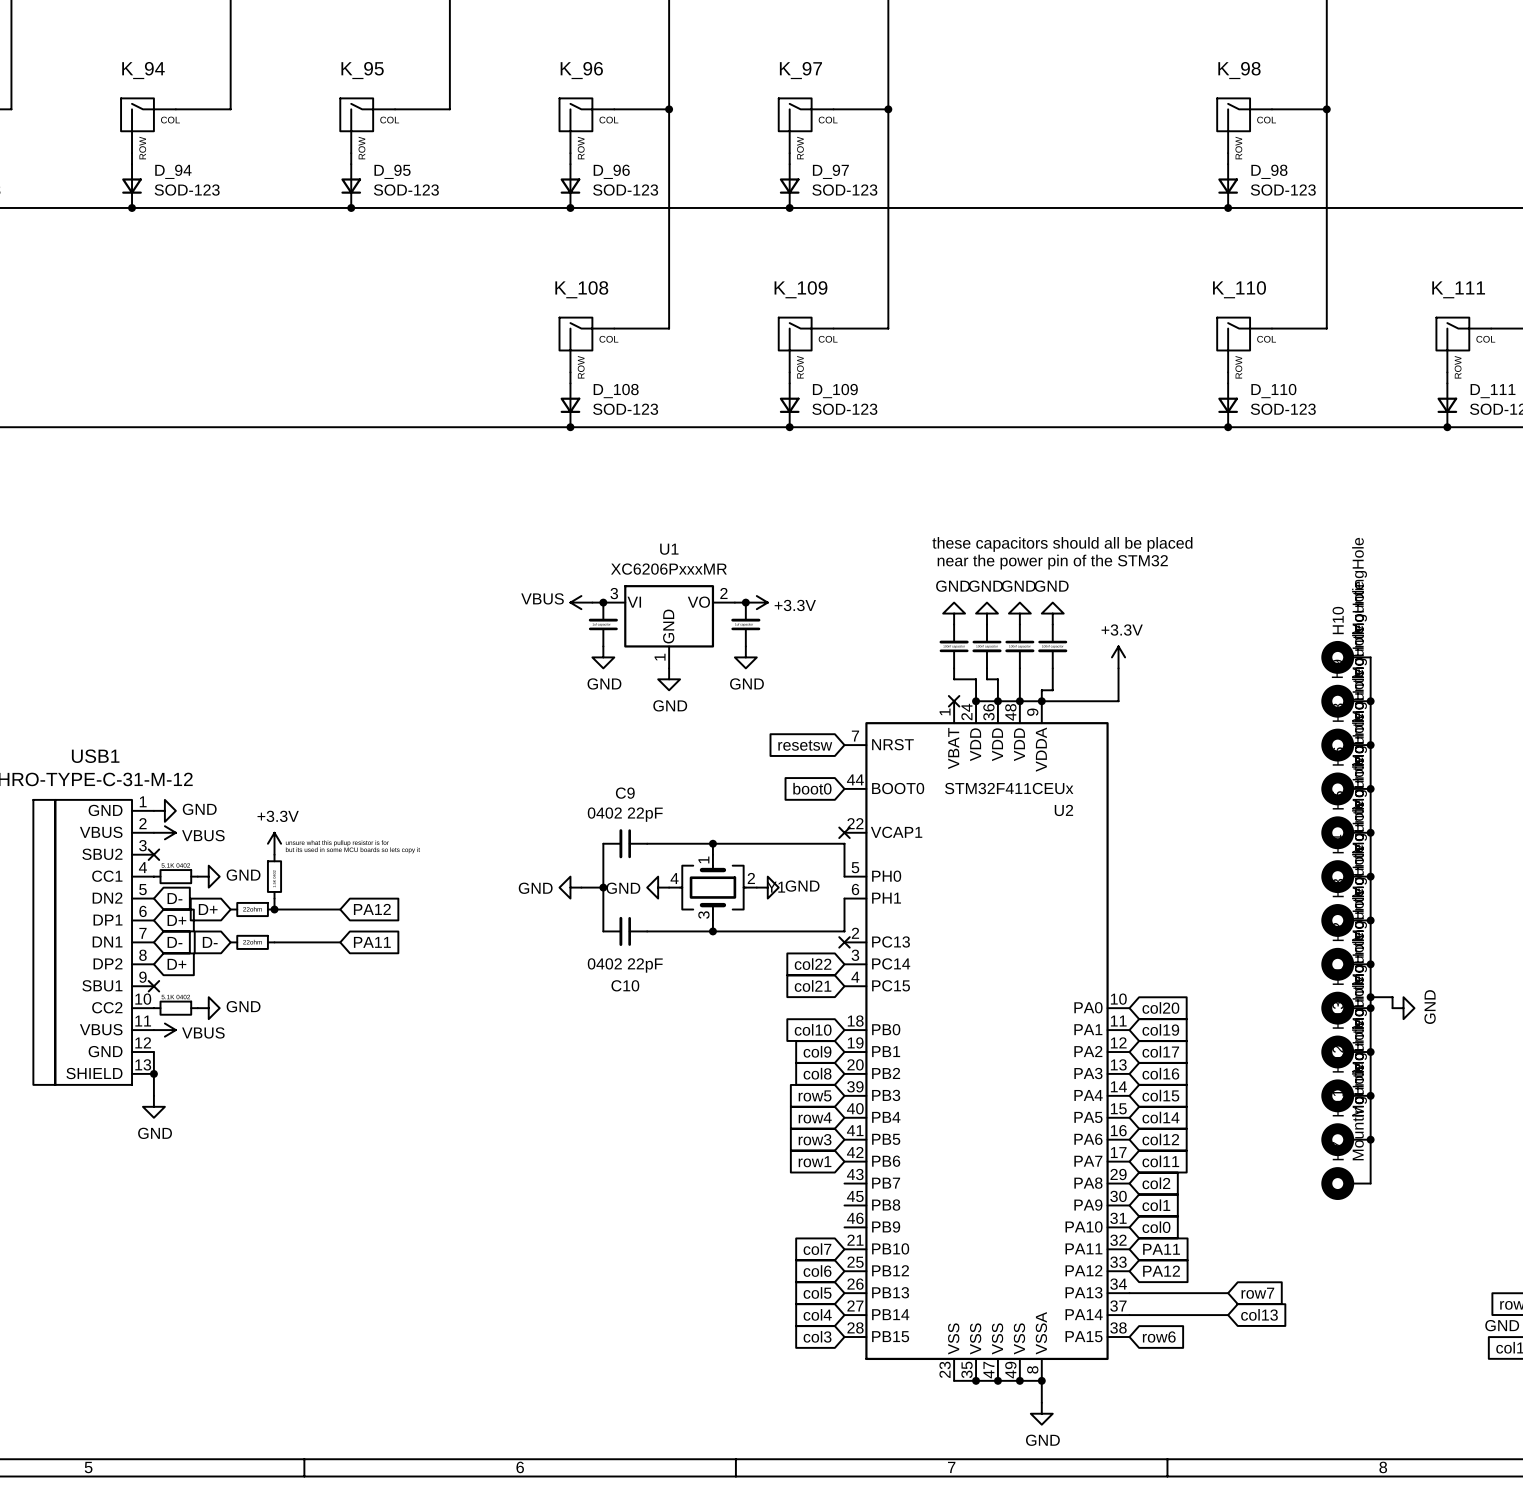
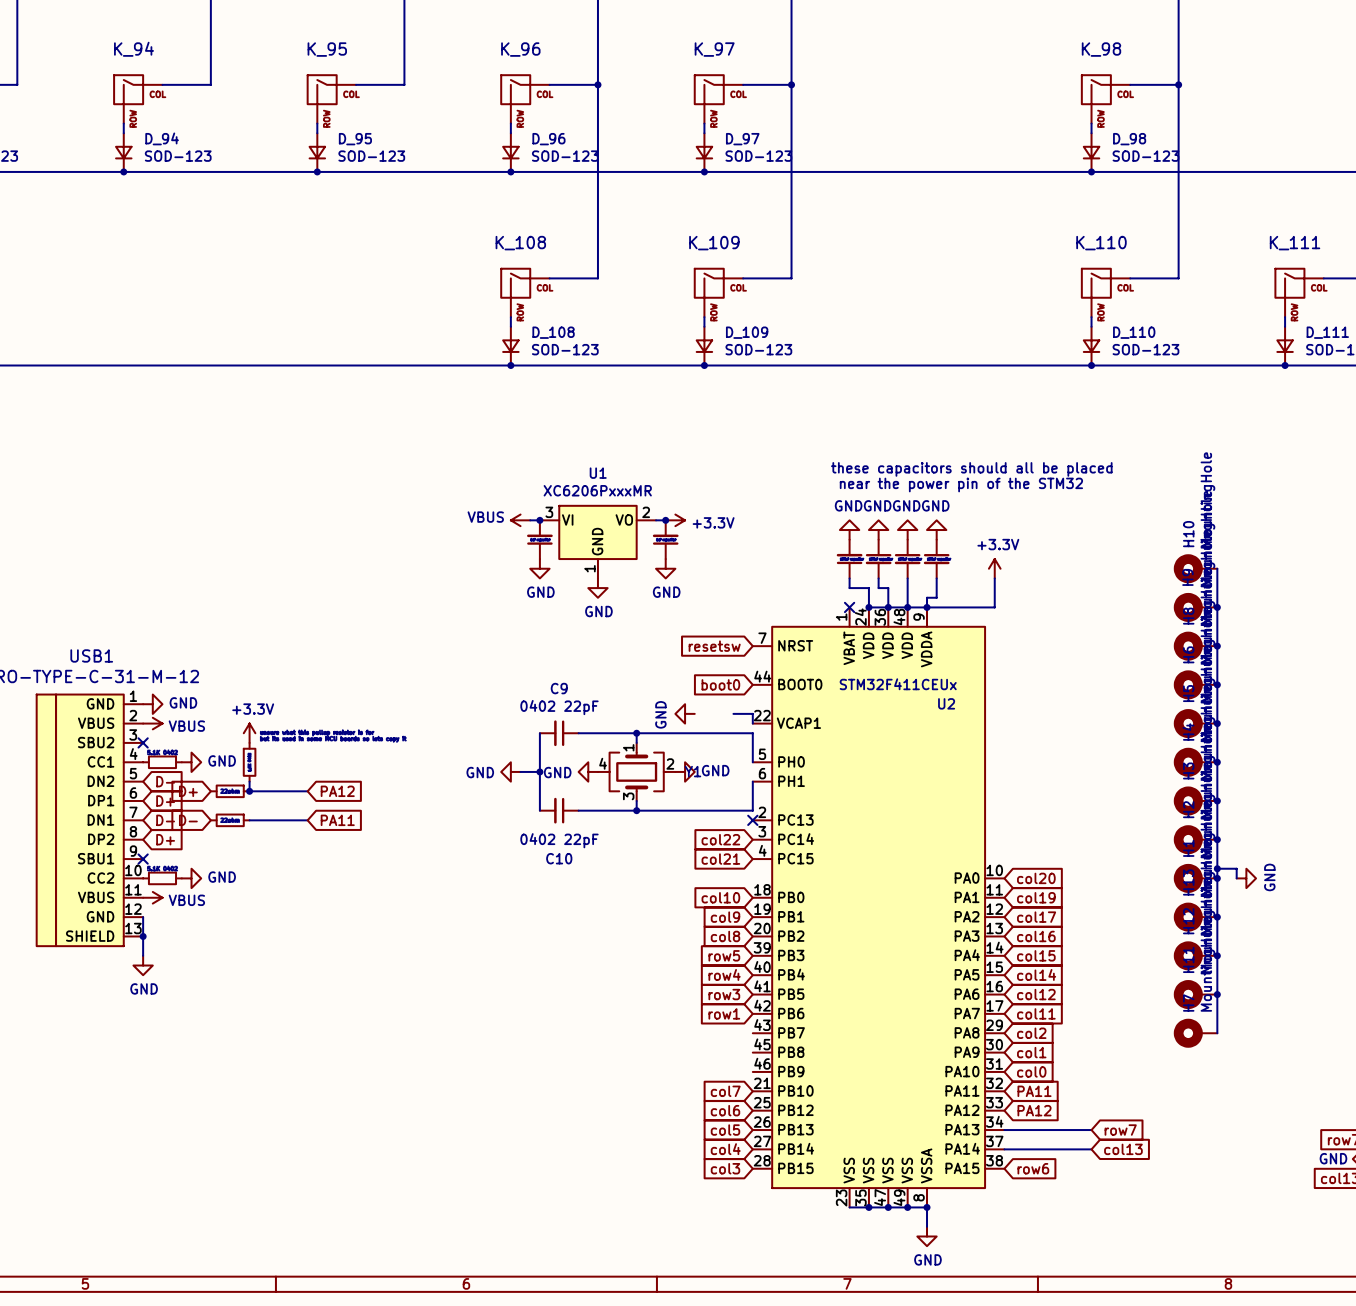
power symbol: none -> GND (685, 713)
wire: none -> (733, 713) (752, 713) (752, 723)
no-connect mark: (844, 832) -> none

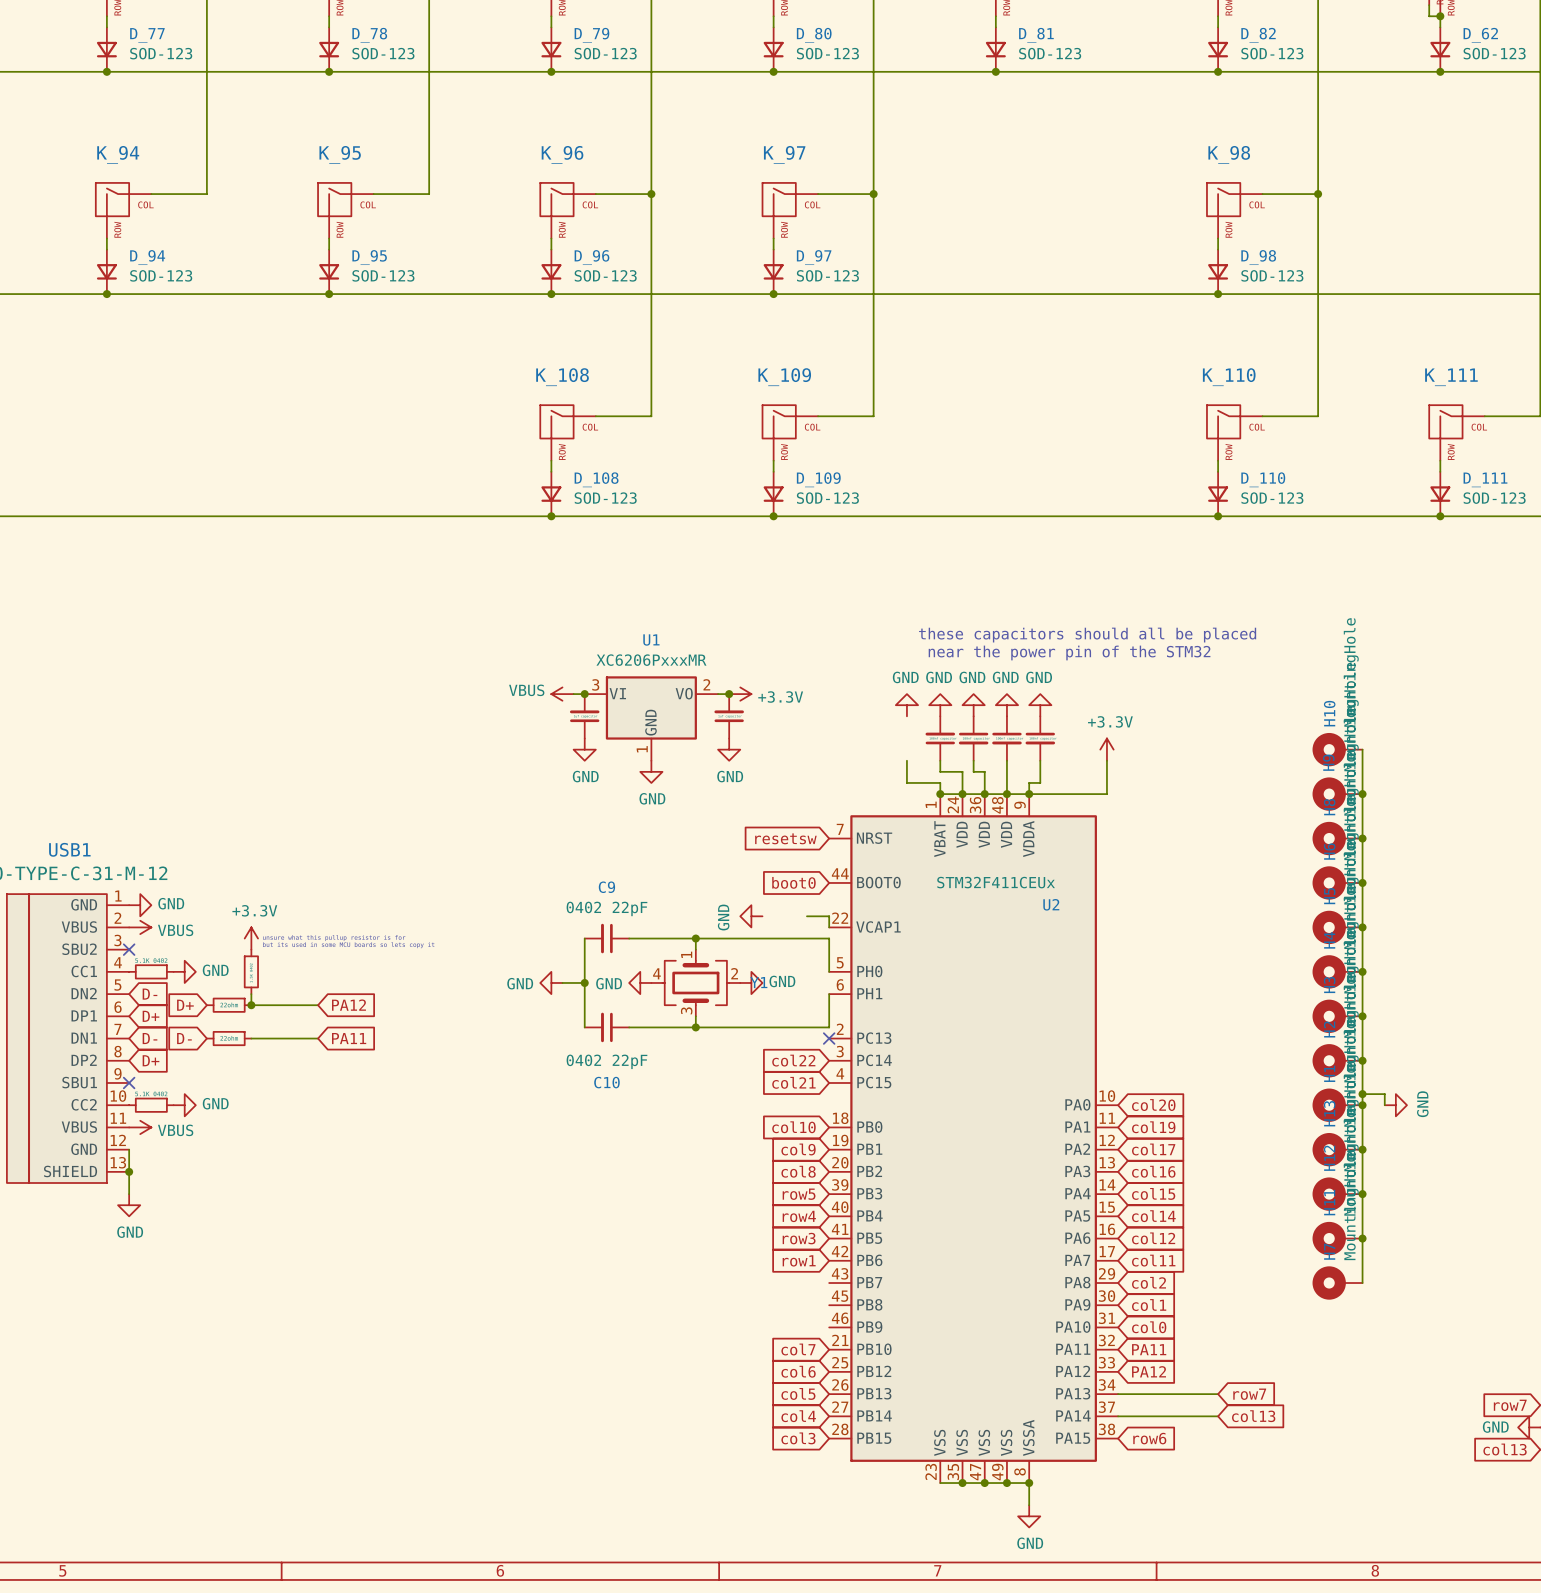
power symbol: none -> GND (906, 705)
wire: none -> (906, 760) (906, 782) (940, 782) (940, 794) (962, 794)
no-connect mark: (849, 607) -> none
junction: none -> (940, 794)

